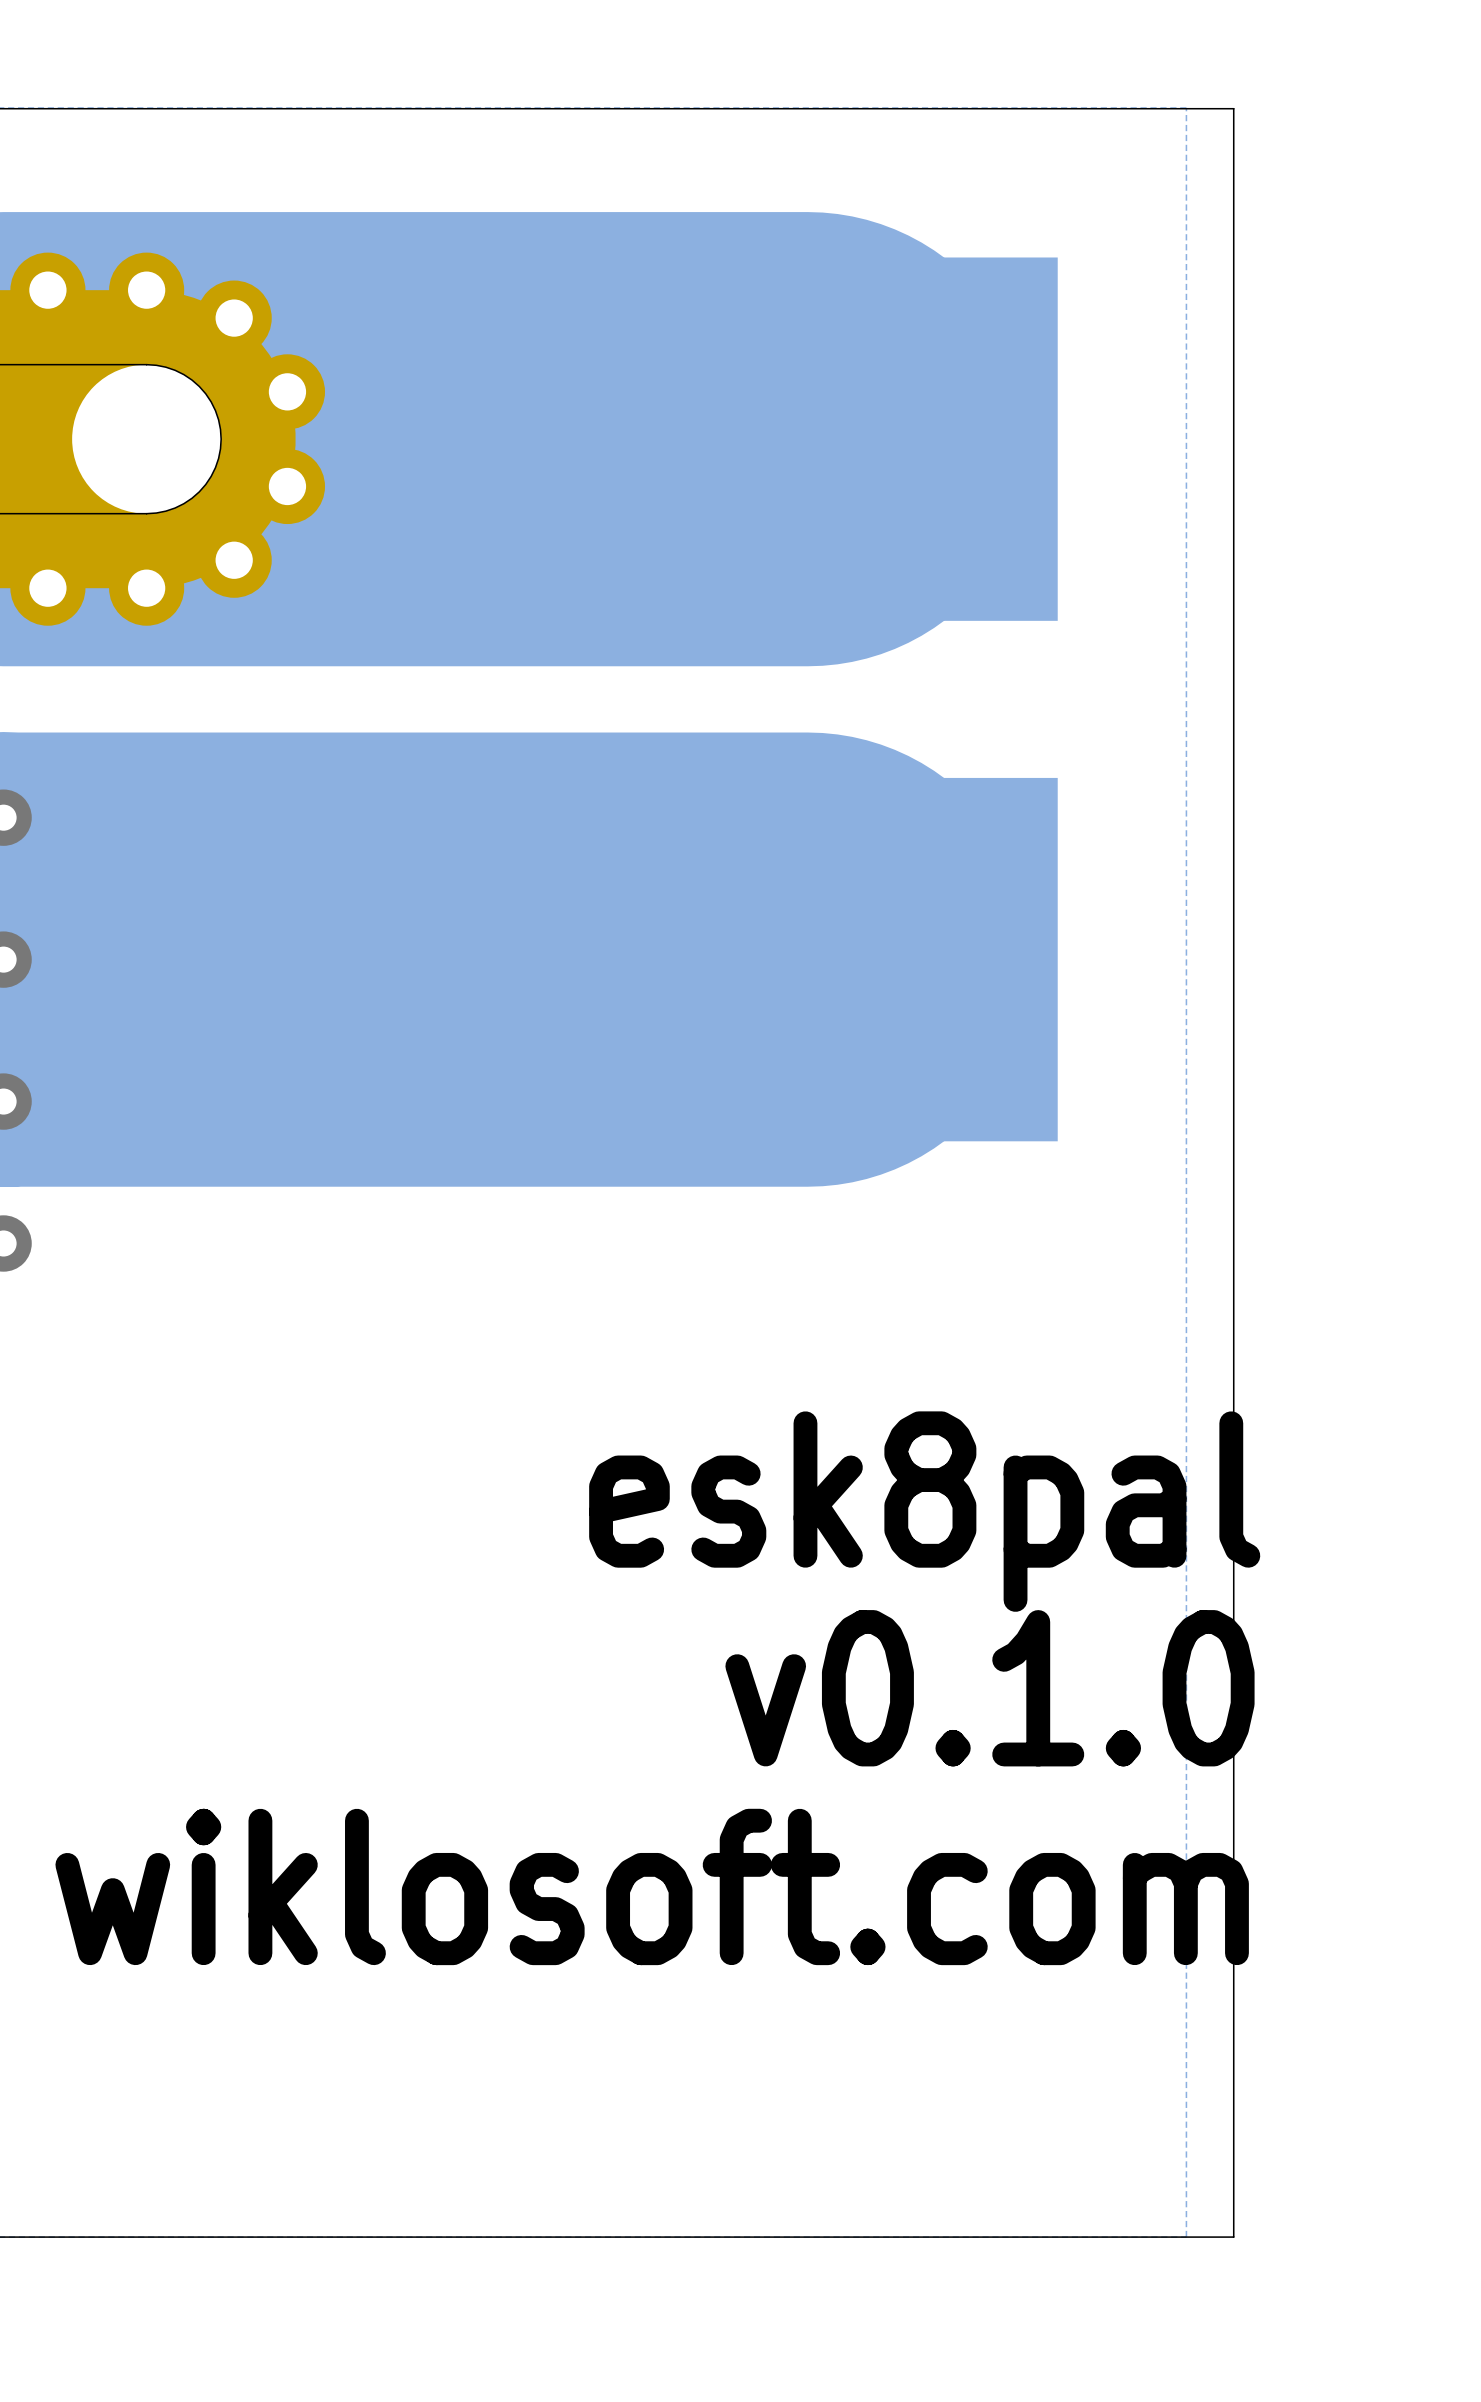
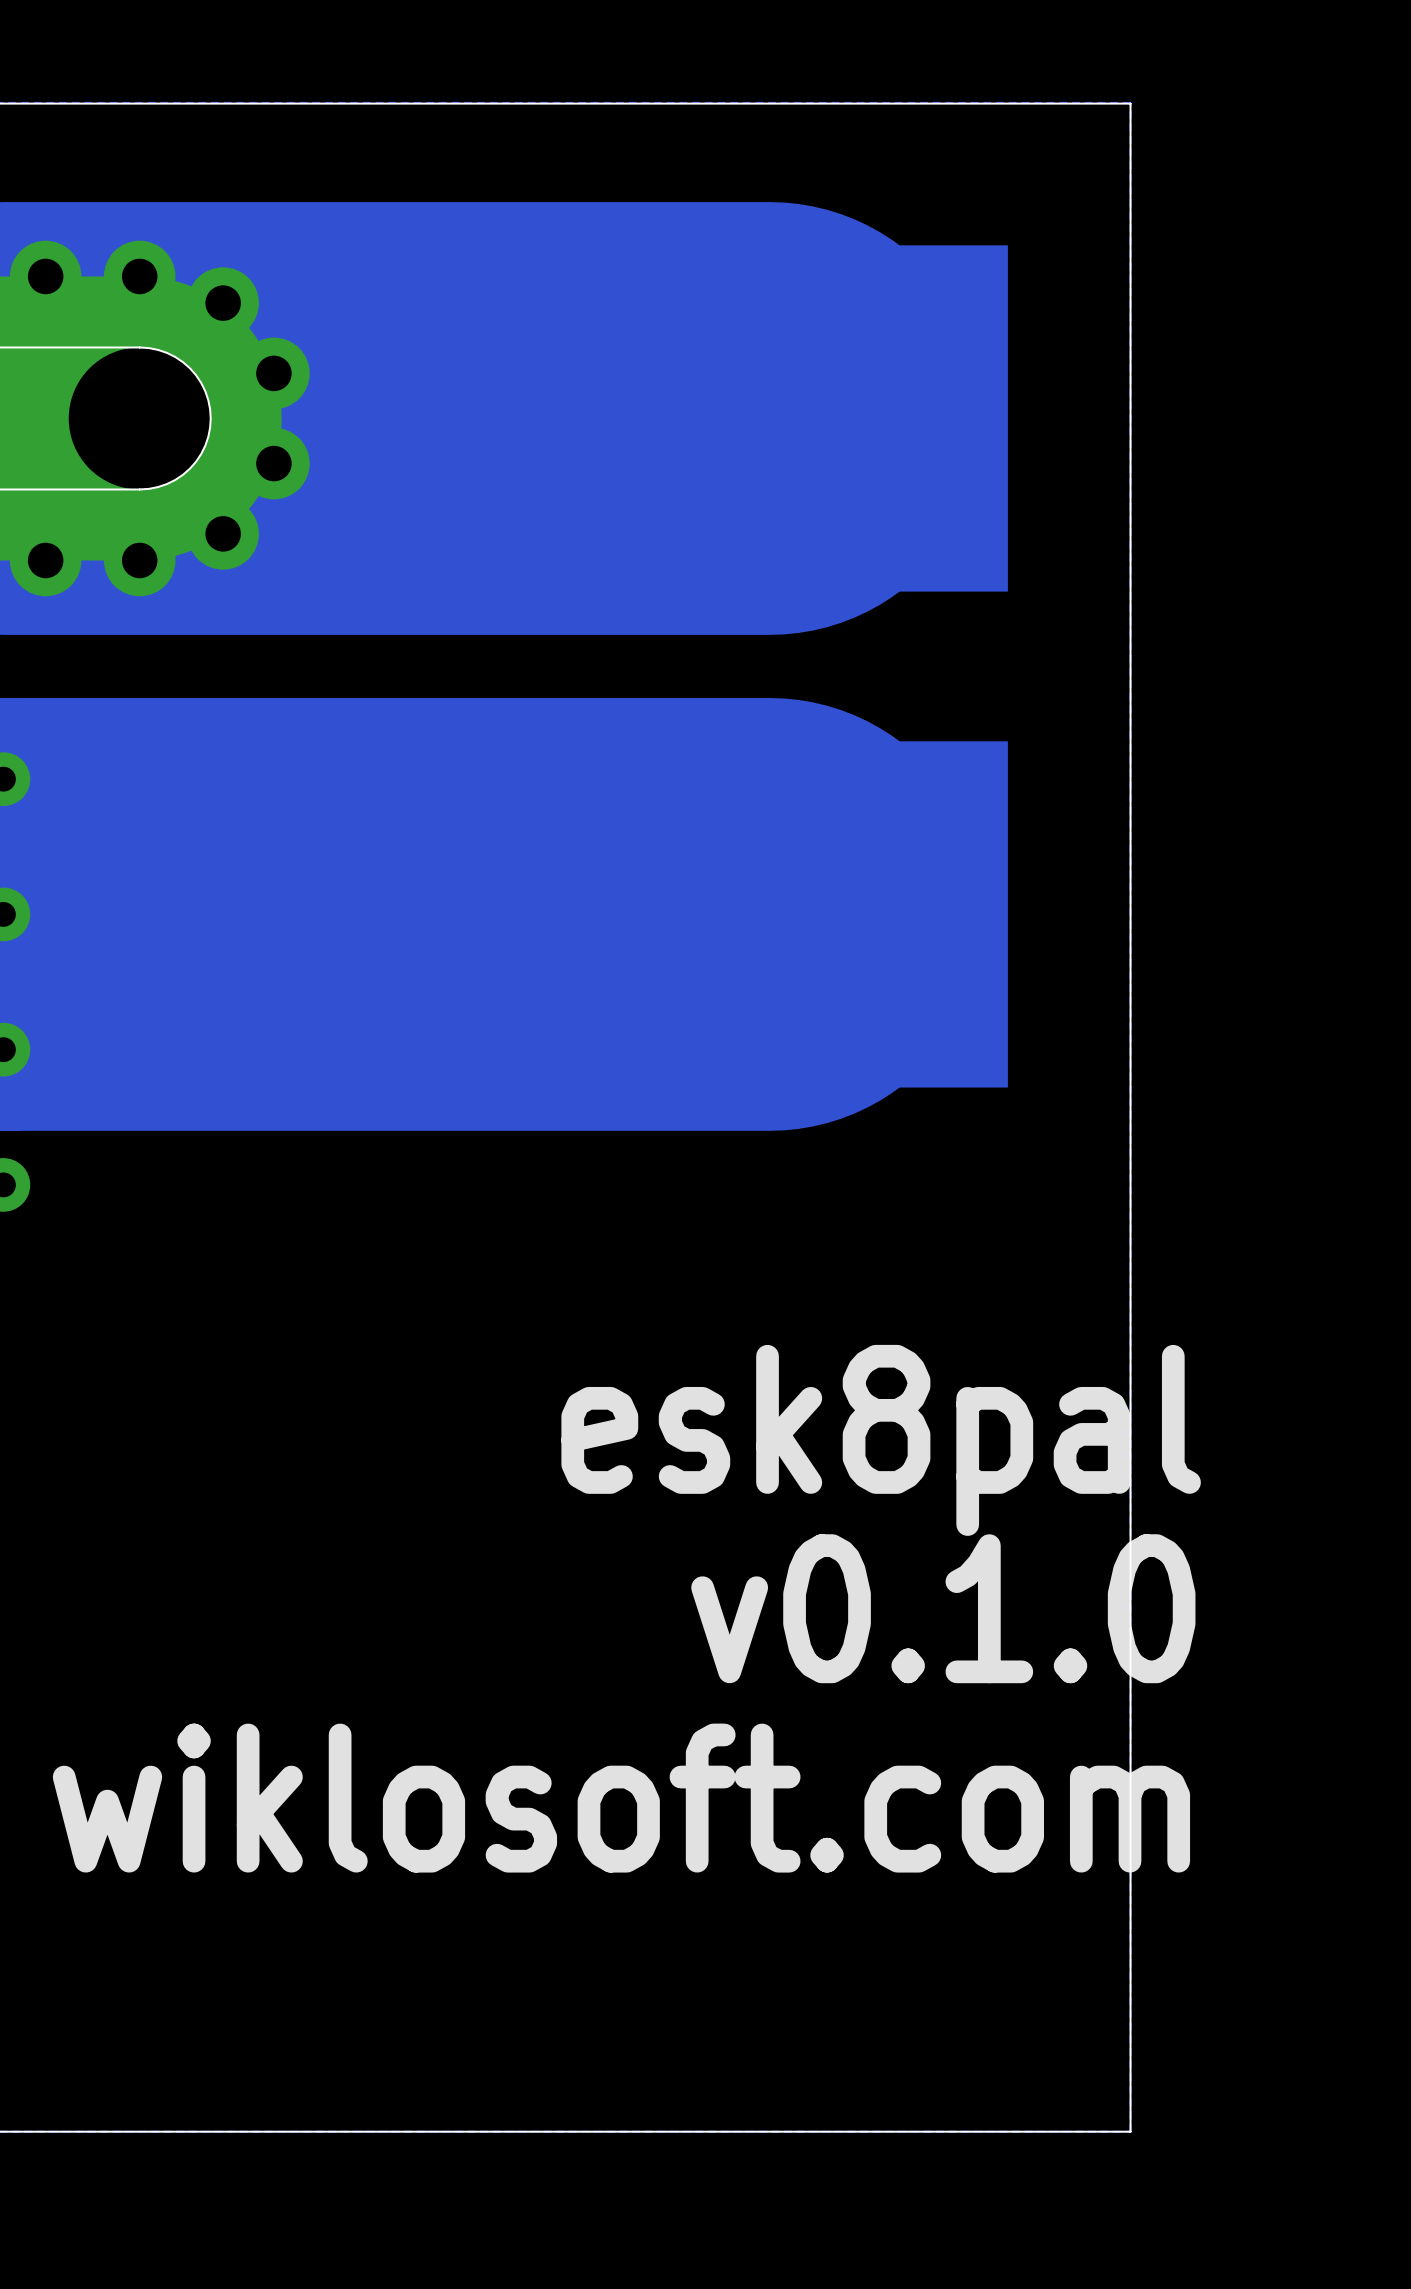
board edge: (1186, 108) (1233, 108) (1233, 2237) (1186, 2237) -> (1130, 103) (1130, 2131)

